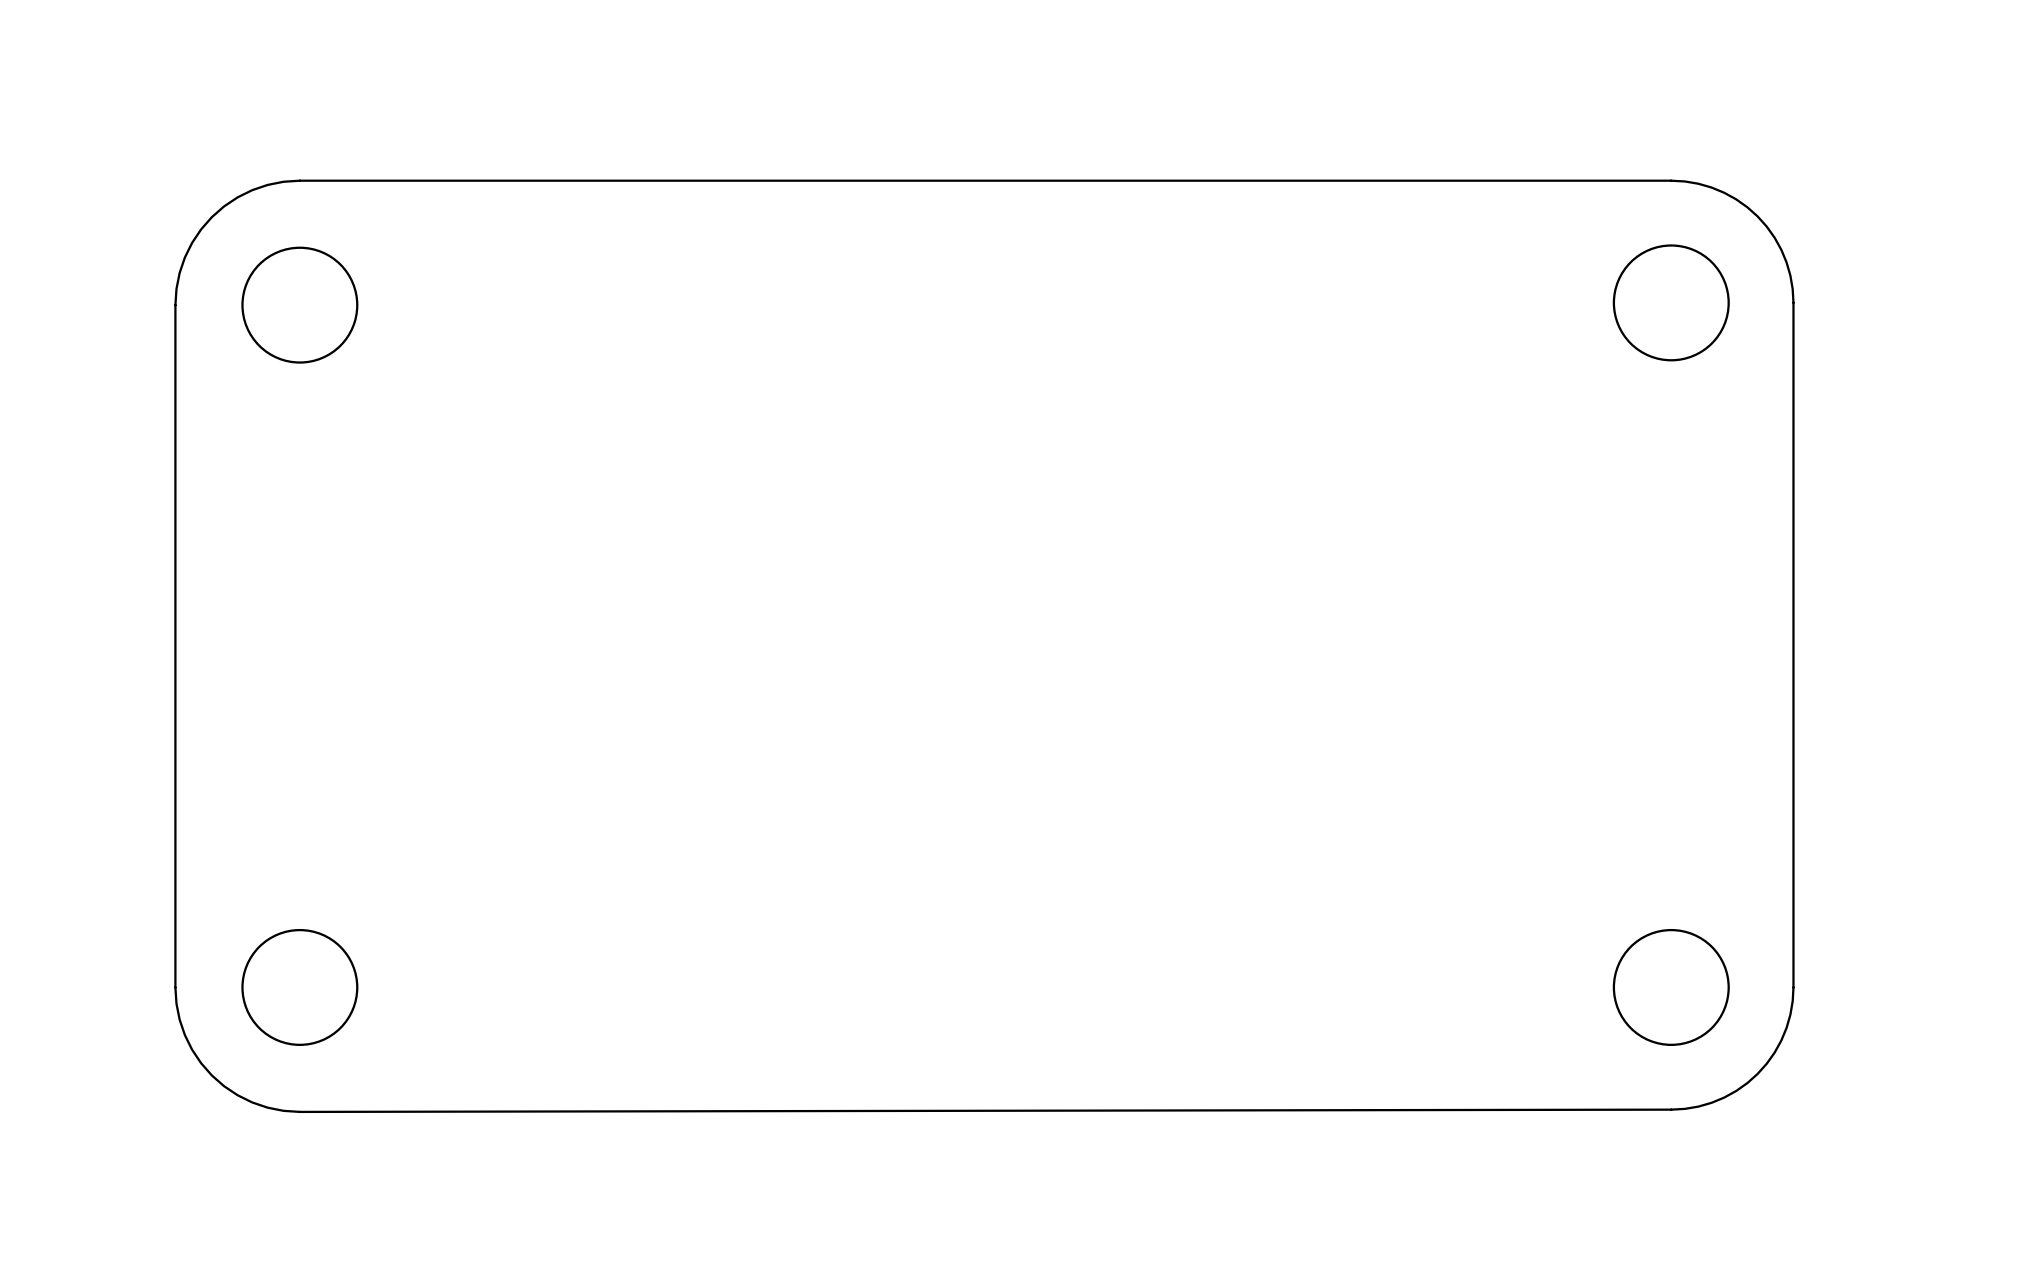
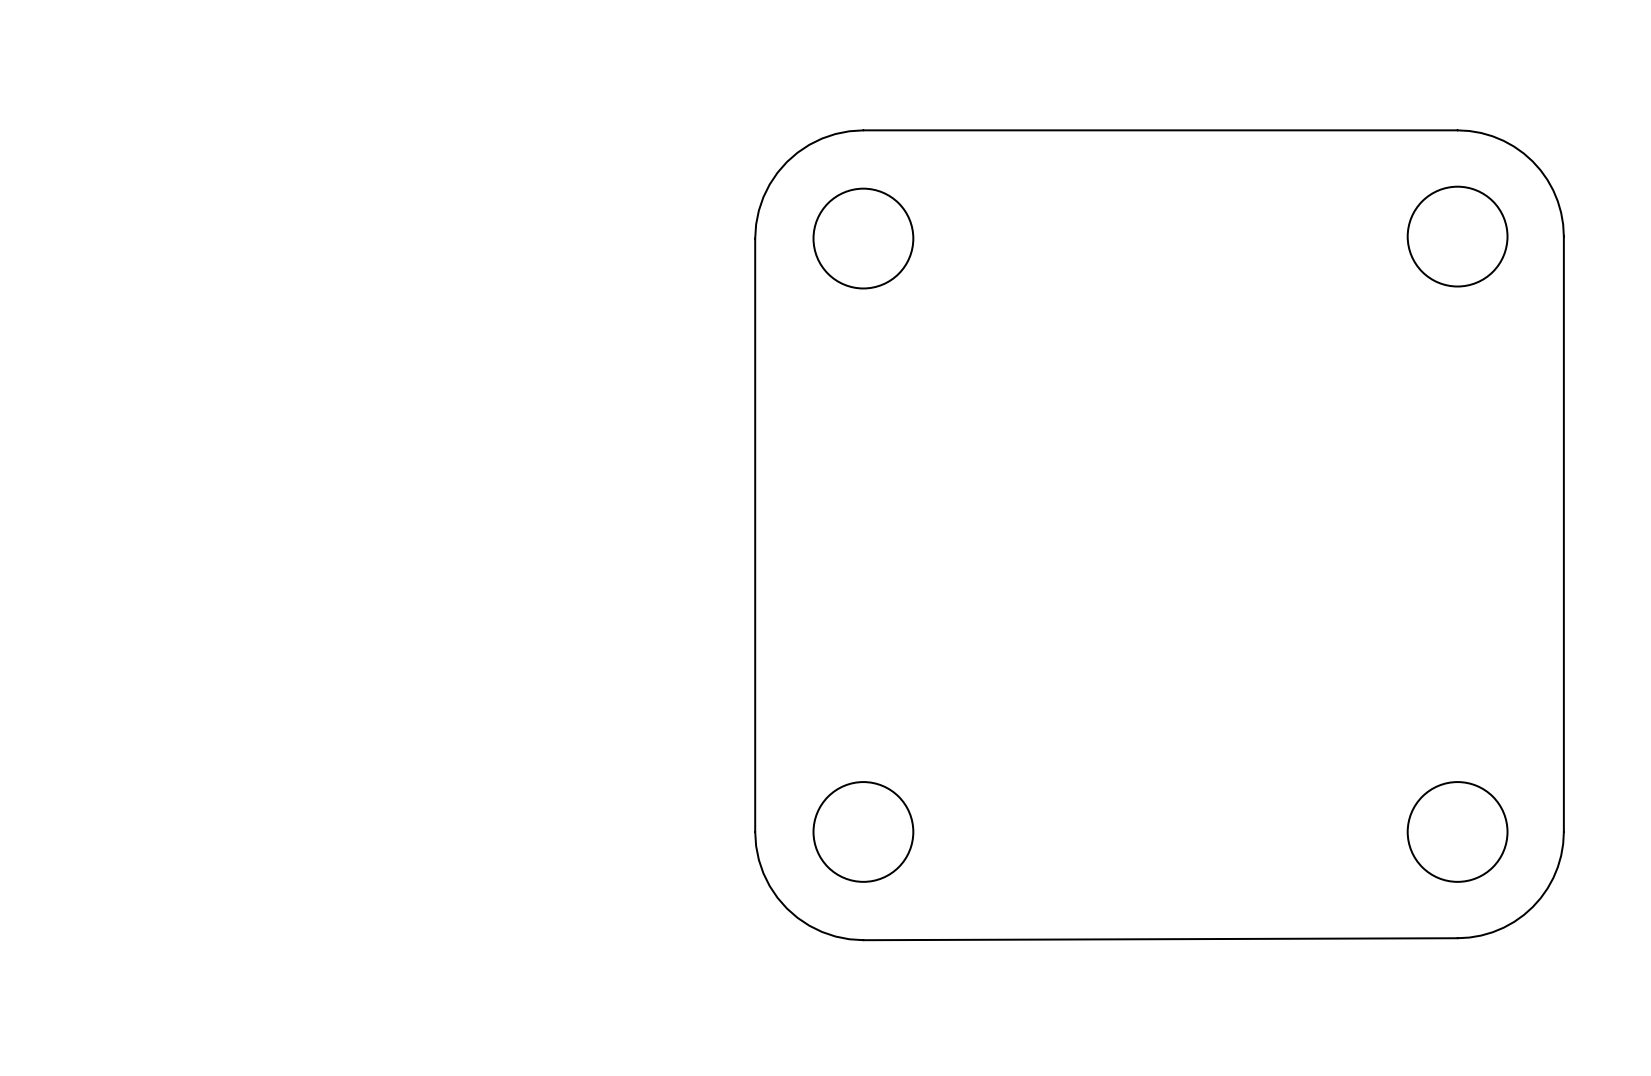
board edge: (988, 180) (299, 180) (283, 181) (252, 190) (237, 197) (211, 217) (192, 242) (184, 257) (176, 288) (175, 305) (175, 987) (176, 1003) (184, 1035) (201, 1063) (224, 1086) (252, 1102) (283, 1110) (299, 1111) (1671, 1109) -> (863, 130) (835, 134) (822, 138) (797, 152) (777, 172) (769, 184) (758, 210) (756, 224) (755, 831) (758, 859) (769, 886) (777, 897) (797, 917) (822, 931) (849, 939) (863, 940) (1457, 938)
round board edge: [241, 246, 359, 364] -> none
round board edge: none -> [812, 187, 915, 290]
round board edge: [241, 928, 359, 1046] -> none
round board edge: none -> [812, 781, 915, 883]

